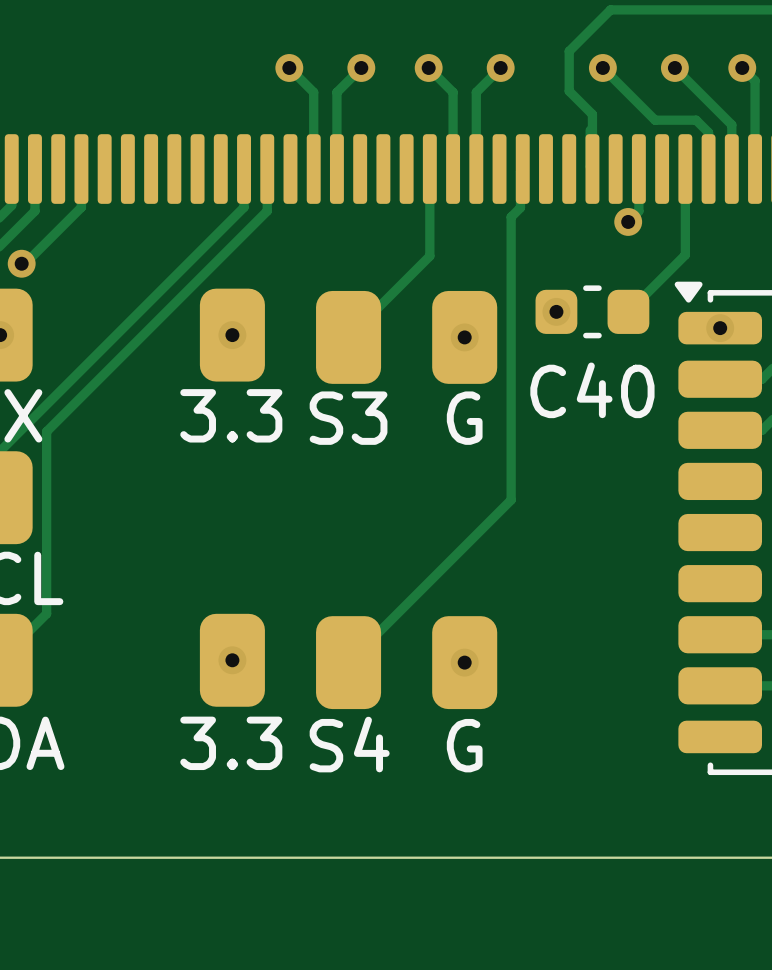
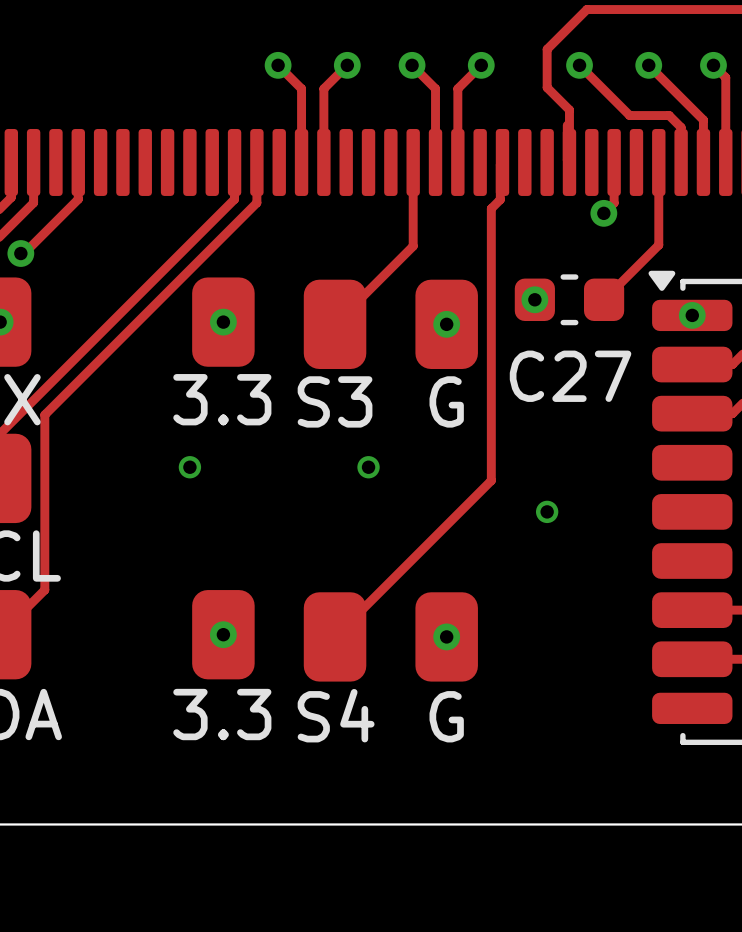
C40 name: C40 (592, 390) -> C27 (570, 376)
via: none -> (189, 467)
via: none -> (368, 467)
via: none -> (547, 511)

